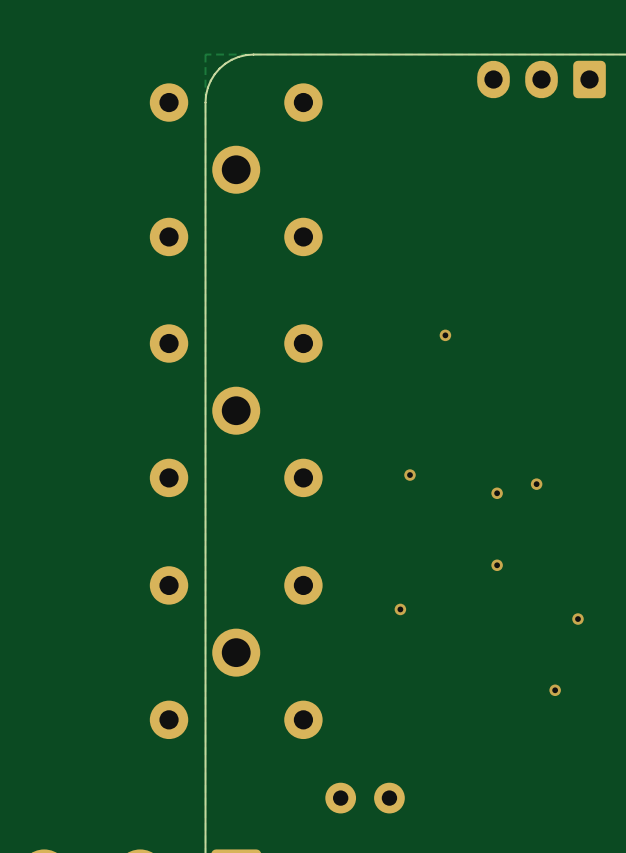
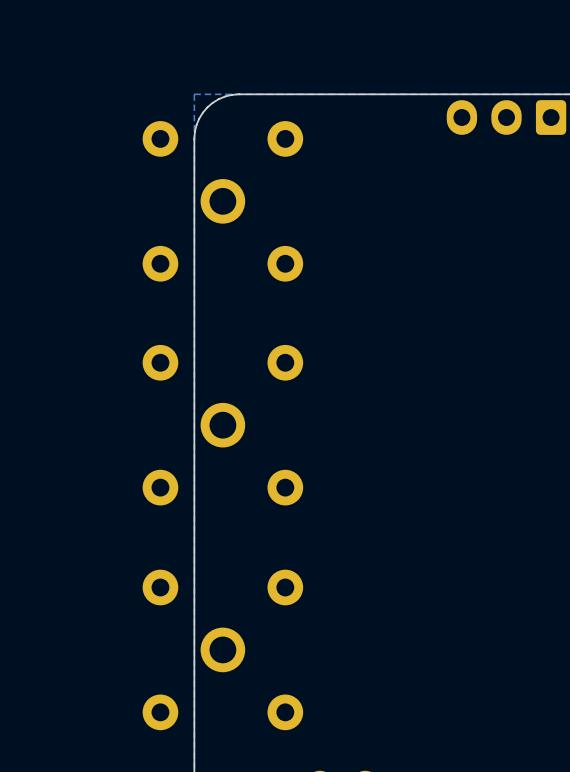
via: (445, 335) -> none
via: (409, 475) -> none
via: (536, 484) -> none
via: (497, 493) -> none
via: (497, 565) -> none
via: (400, 609) -> none
via: (577, 619) -> none
via: (555, 690) -> none

